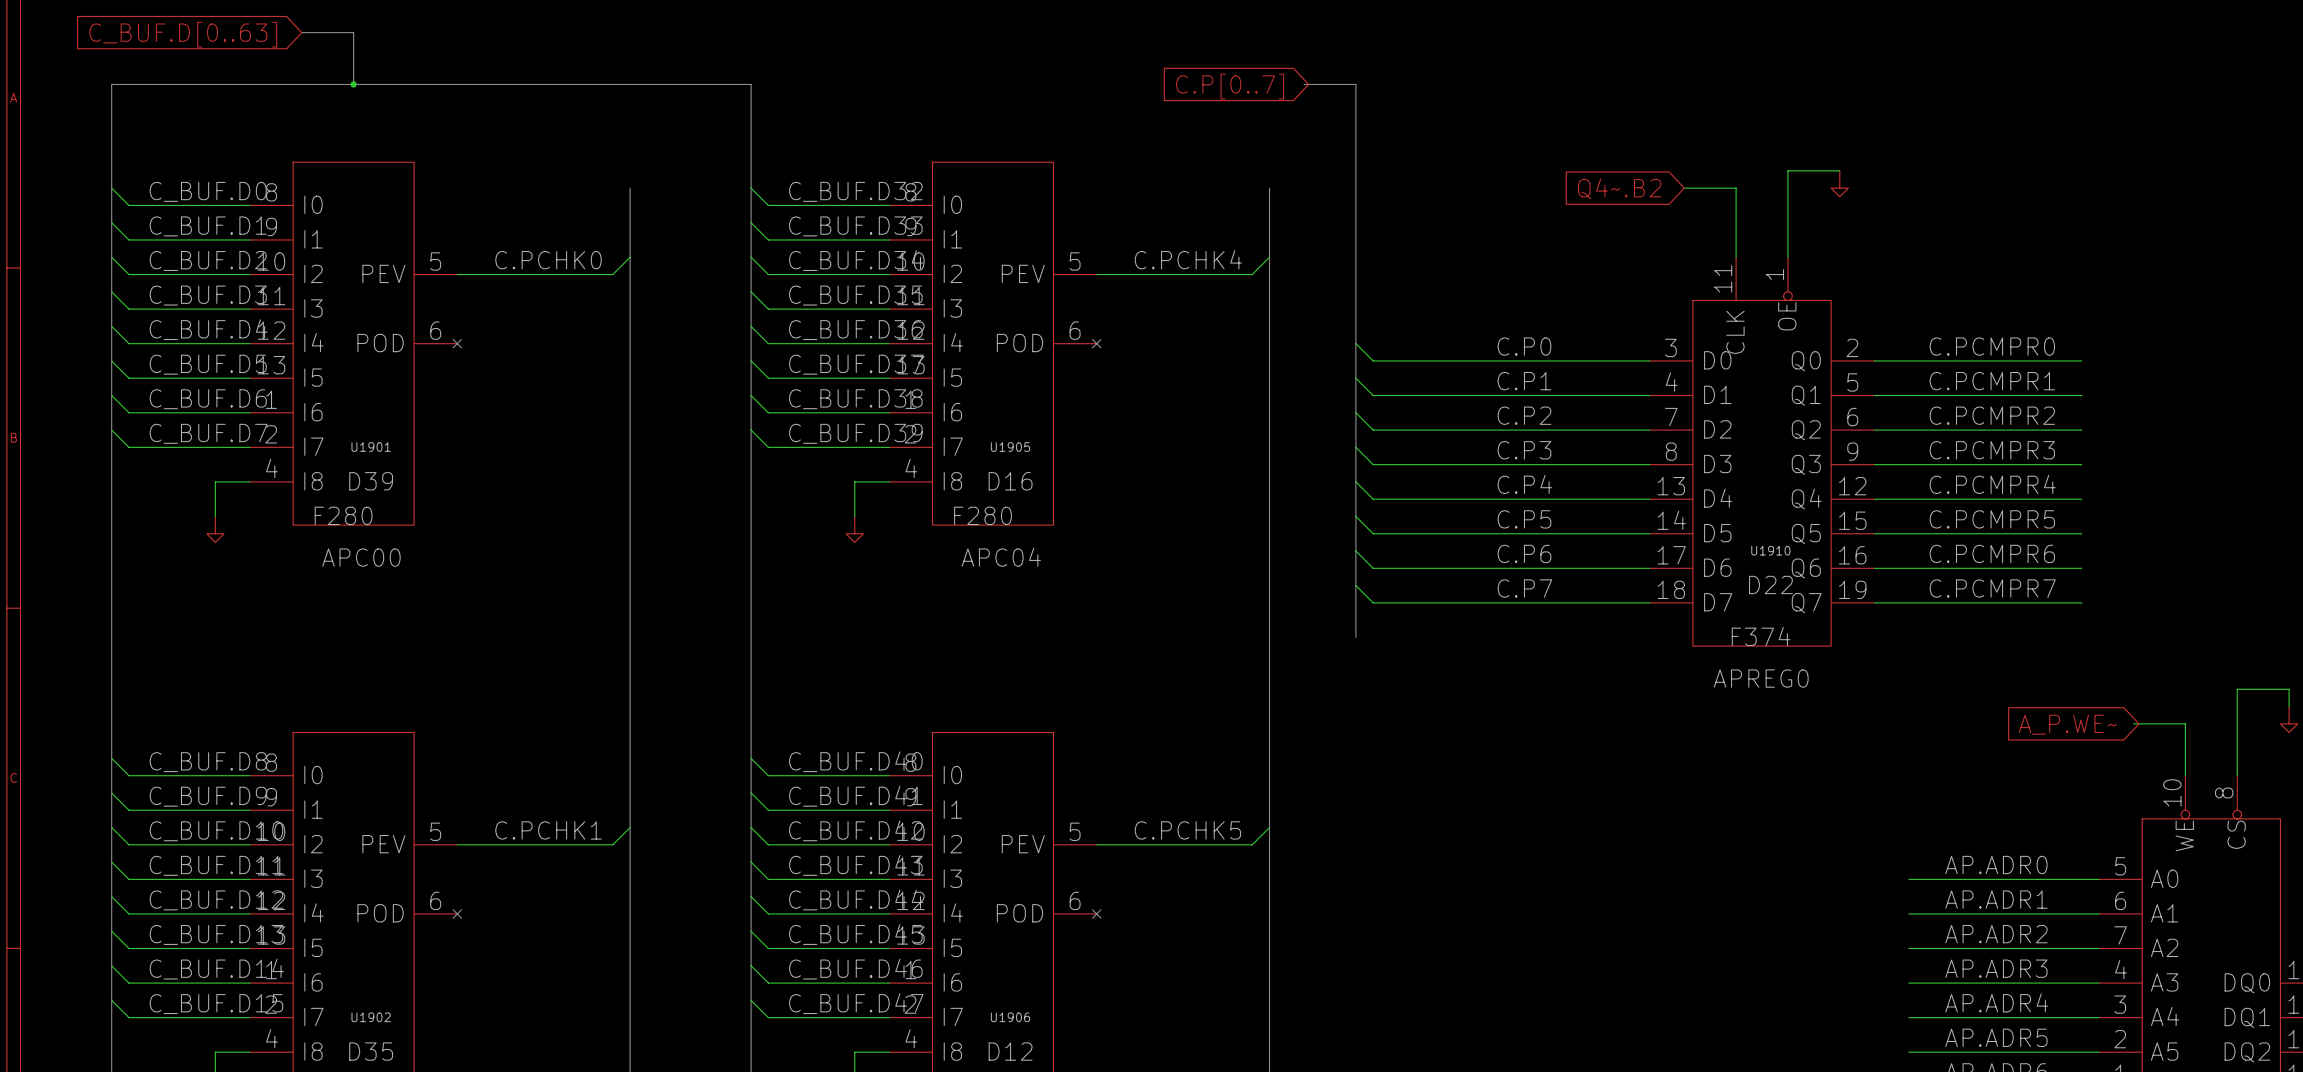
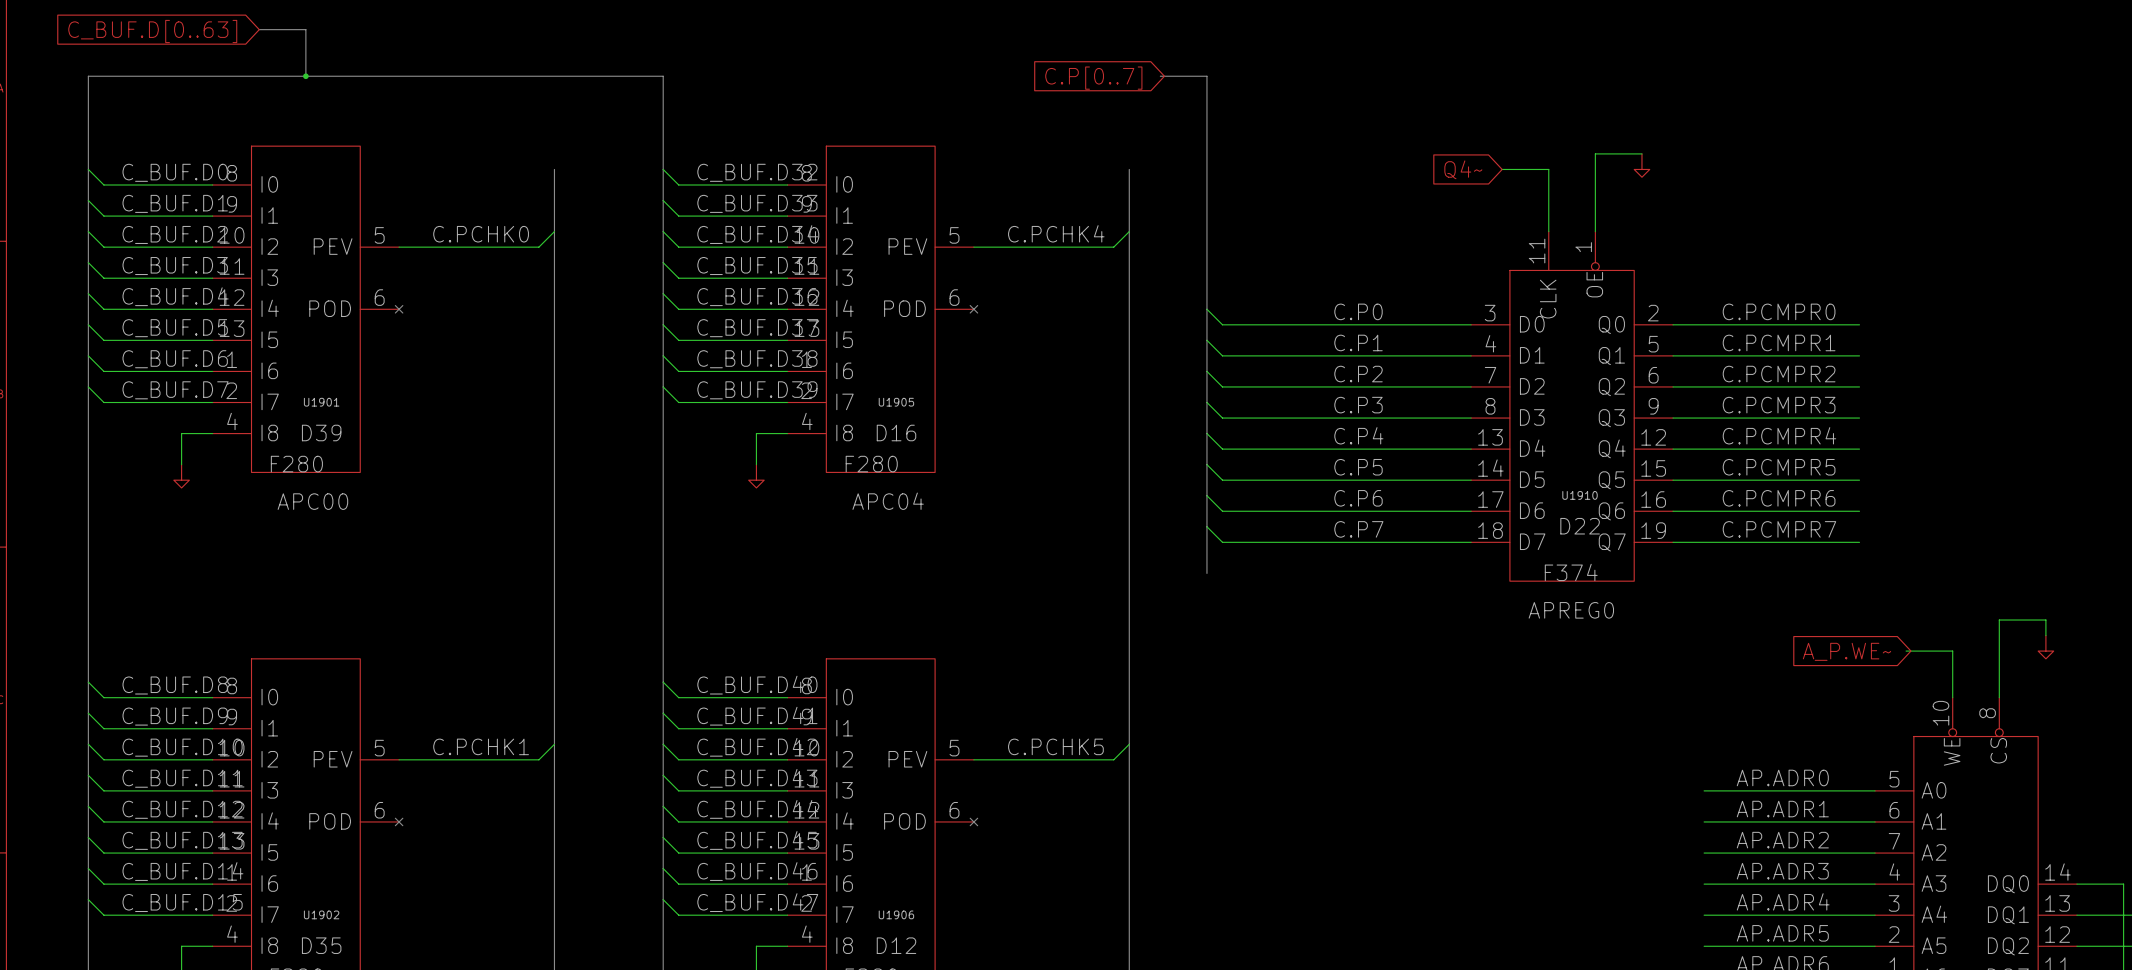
global label: Q4~.B2 (1619, 188) -> Q4~ (1463, 169)

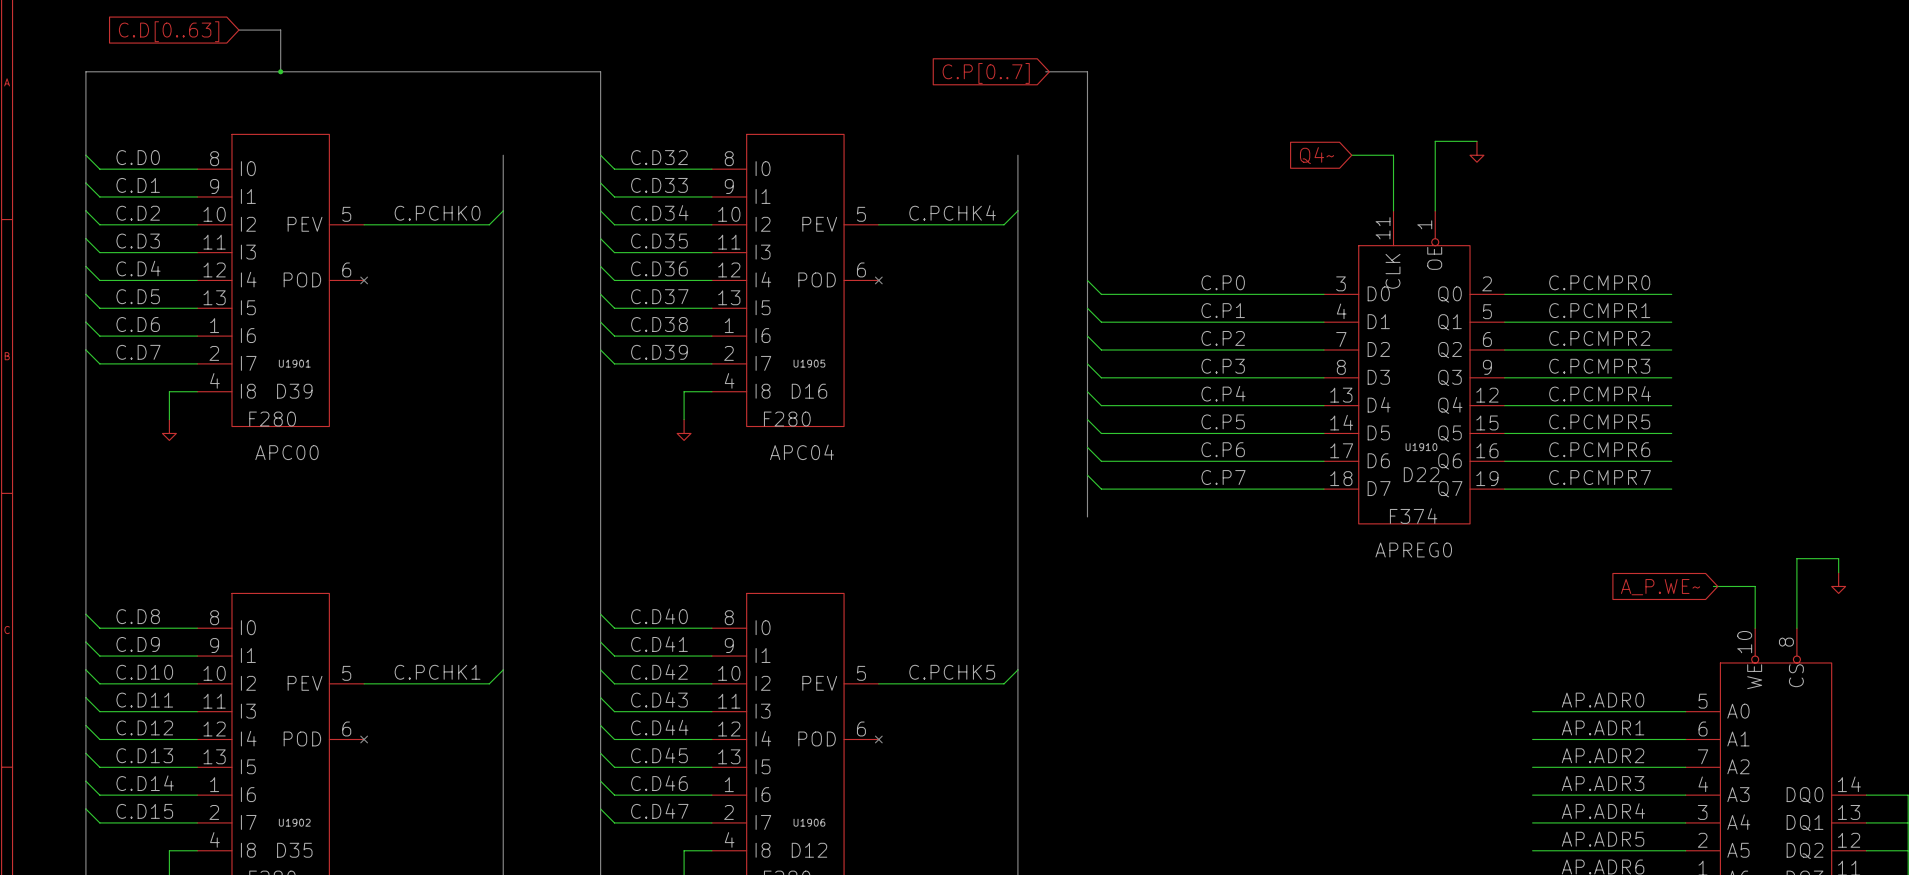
global label: C_BUF.D[0..63] (152, 31) -> C.D[0..63] (169, 31)
label: C_BUF.D0 (175, 172) -> C.D0 (138, 157)
label: C_BUF.D32 (757, 172) -> C.D32 (659, 157)
label: C_BUF.D1 (175, 203) -> C.D1 (138, 185)
label: C_BUF.D33 (757, 203) -> C.D33 (659, 185)
label: C_BUF.D2 (175, 234) -> C.D2 (138, 213)
label: C_BUF.D34 (757, 234) -> C.D34 (659, 212)
label: C_BUF.D3 (175, 266) -> C.D3 (138, 241)
label: C_BUF.D35 (757, 266) -> C.D35 (659, 241)
label: C_BUF.D4 (175, 296) -> C.D4 (138, 268)
label: C_BUF.D36 (757, 297) -> C.D36 (659, 268)
label: C_BUF.D5 (175, 328) -> C.D5 (138, 296)
label: C_BUF.D37 (757, 328) -> C.D37 (659, 296)
label: C_BUF.D6 (175, 359) -> C.D6 (138, 324)
label: C_BUF.D38 (757, 359) -> C.D38 (659, 324)
label: C_BUF.D7 (175, 390) -> C.D7 (138, 352)
label: C_BUF.D39 (757, 390) -> C.D39 (659, 352)
label: C_BUF.D8 (175, 685) -> C.D8 (138, 616)
label: C_BUF.D40 (757, 685) -> C.D40 (659, 616)
label: C_BUF.D9 (175, 716) -> C.D9 (138, 644)
label: C_BUF.D41 (757, 716) -> C.D41 (659, 644)
label: C_BUF.D10 (182, 747) -> C.D10 (144, 672)
label: C_BUF.D42 (757, 747) -> C.D42 (659, 671)
label: C_BUF.D11 (182, 778) -> C.D11 (144, 700)
label: C_BUF.D43 (757, 778) -> C.D43 (659, 699)
label: C_BUF.D12 (182, 809) -> C.D12 (144, 727)
label: C_BUF.D44 (757, 809) -> C.D44 (659, 727)
label: C_BUF.D13 (182, 840) -> C.D13 (144, 755)
label: C_BUF.D45 (757, 840) -> C.D45 (659, 755)
label: C_BUF.D14 (182, 871) -> C.D14 (145, 783)
label: C_BUF.D46 (757, 871) -> C.D46 (659, 783)
label: C_BUF.D47 (757, 902) -> C.D47 (659, 811)
label: C_BUF.D15 (182, 903) -> C.D15 (144, 811)

